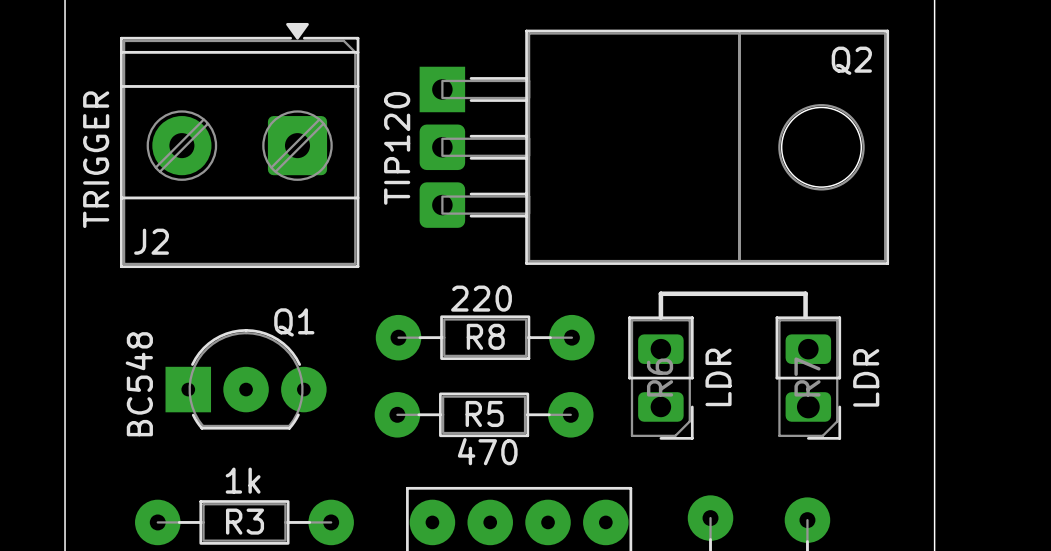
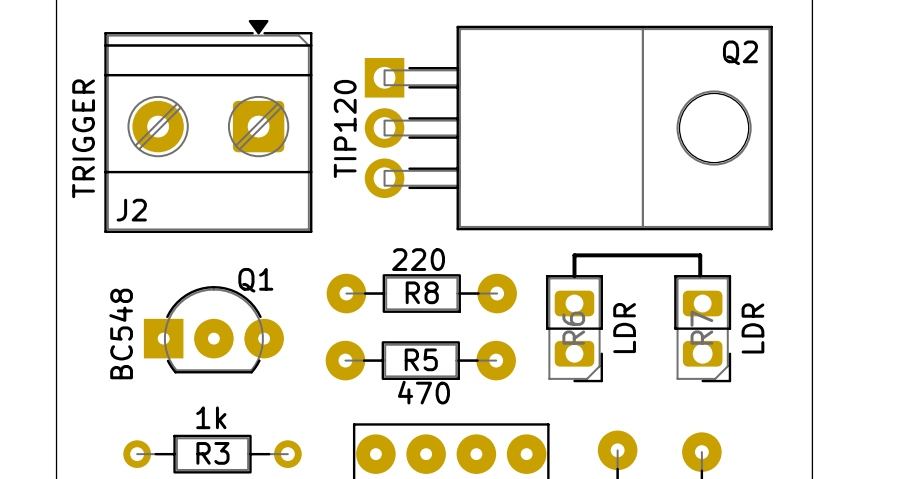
Q2 footprint: [419, 29, 890, 265] -> [364, 25, 773, 231]
R3 footprint: [135, 499, 354, 546] -> [123, 434, 302, 474]

